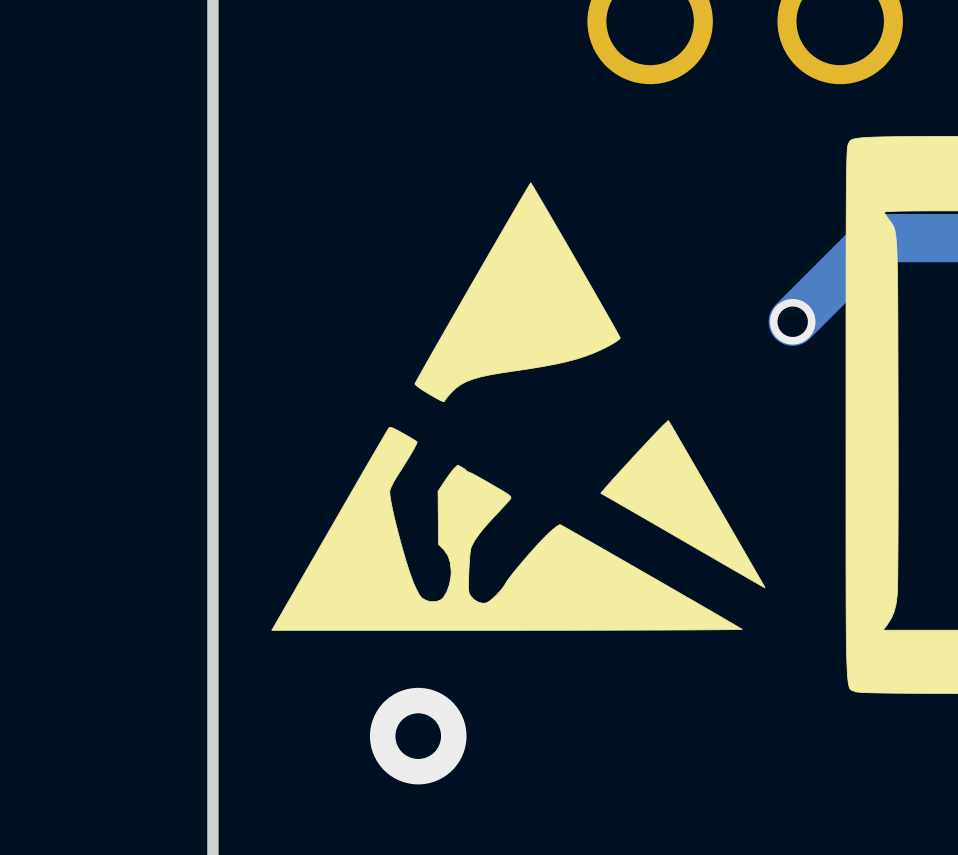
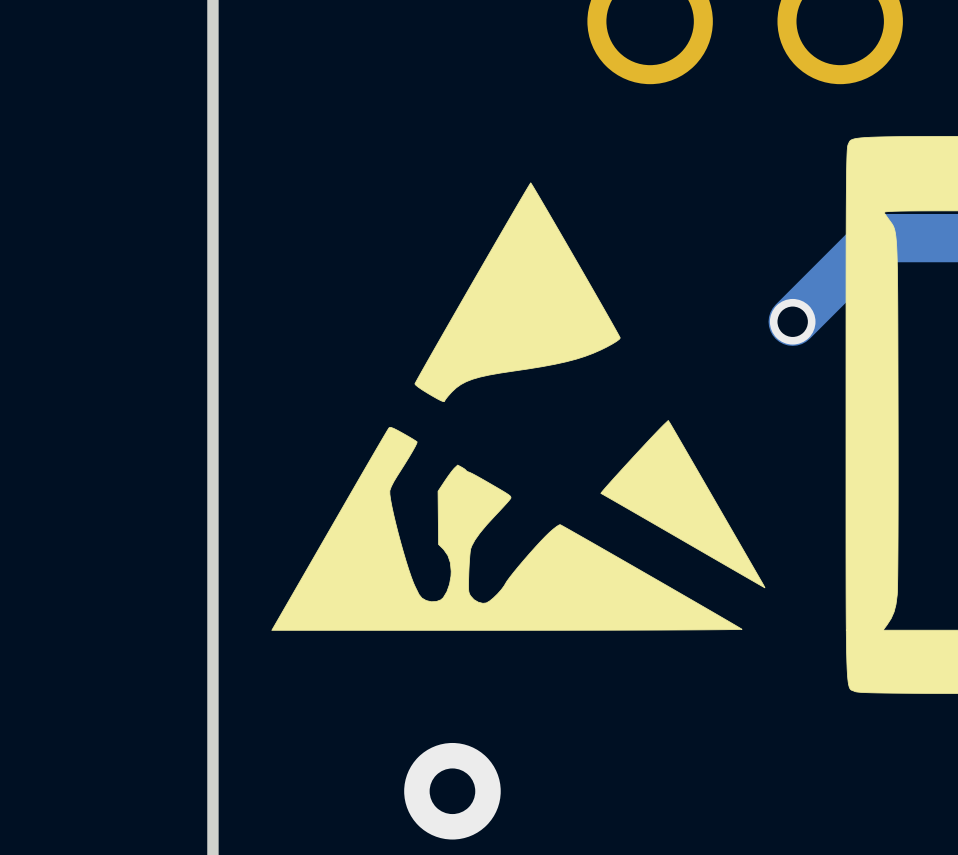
via position: (418, 736) -> (452, 791)

